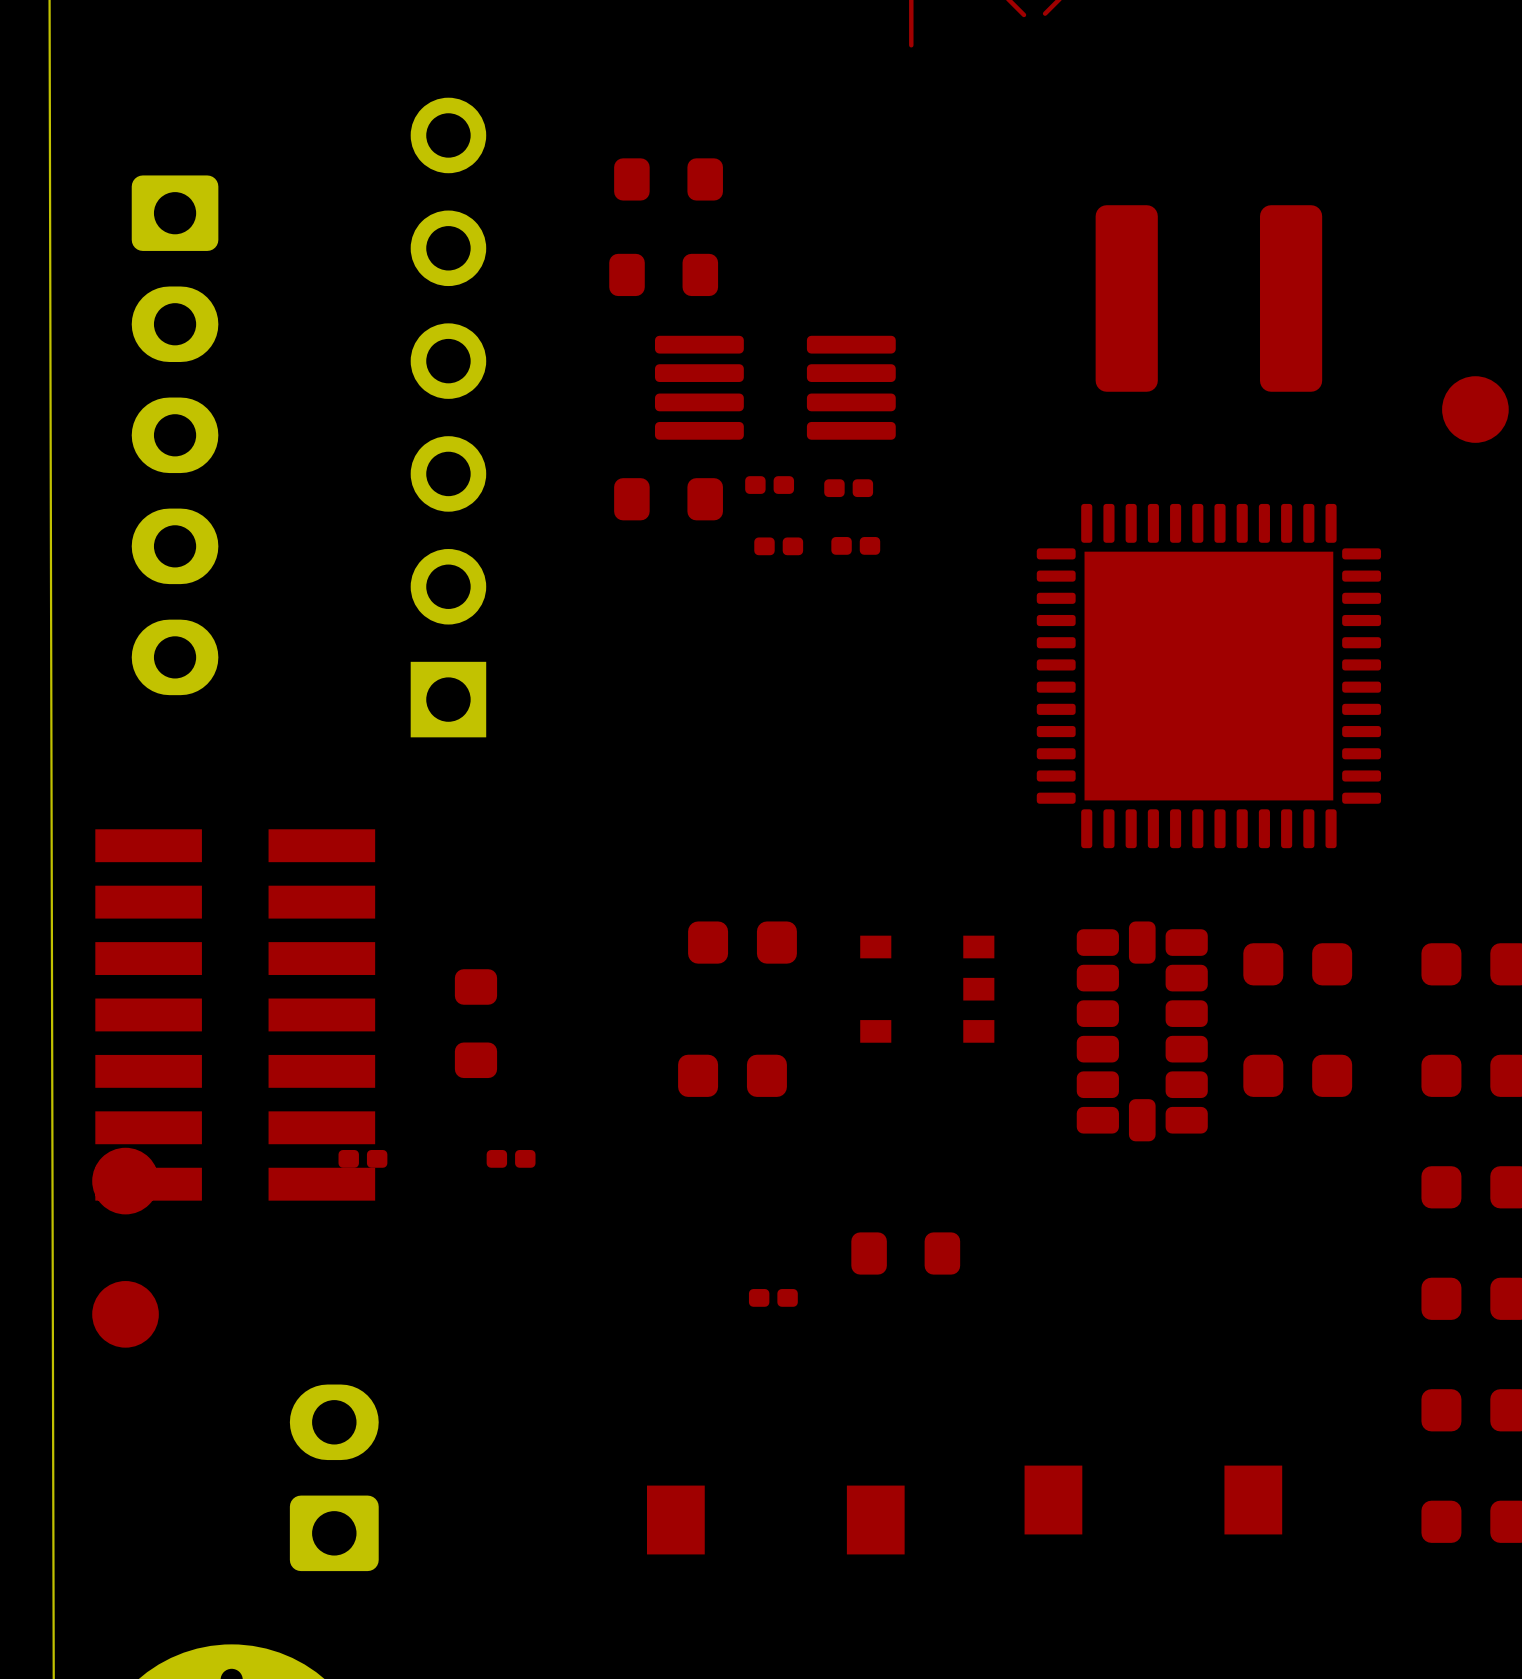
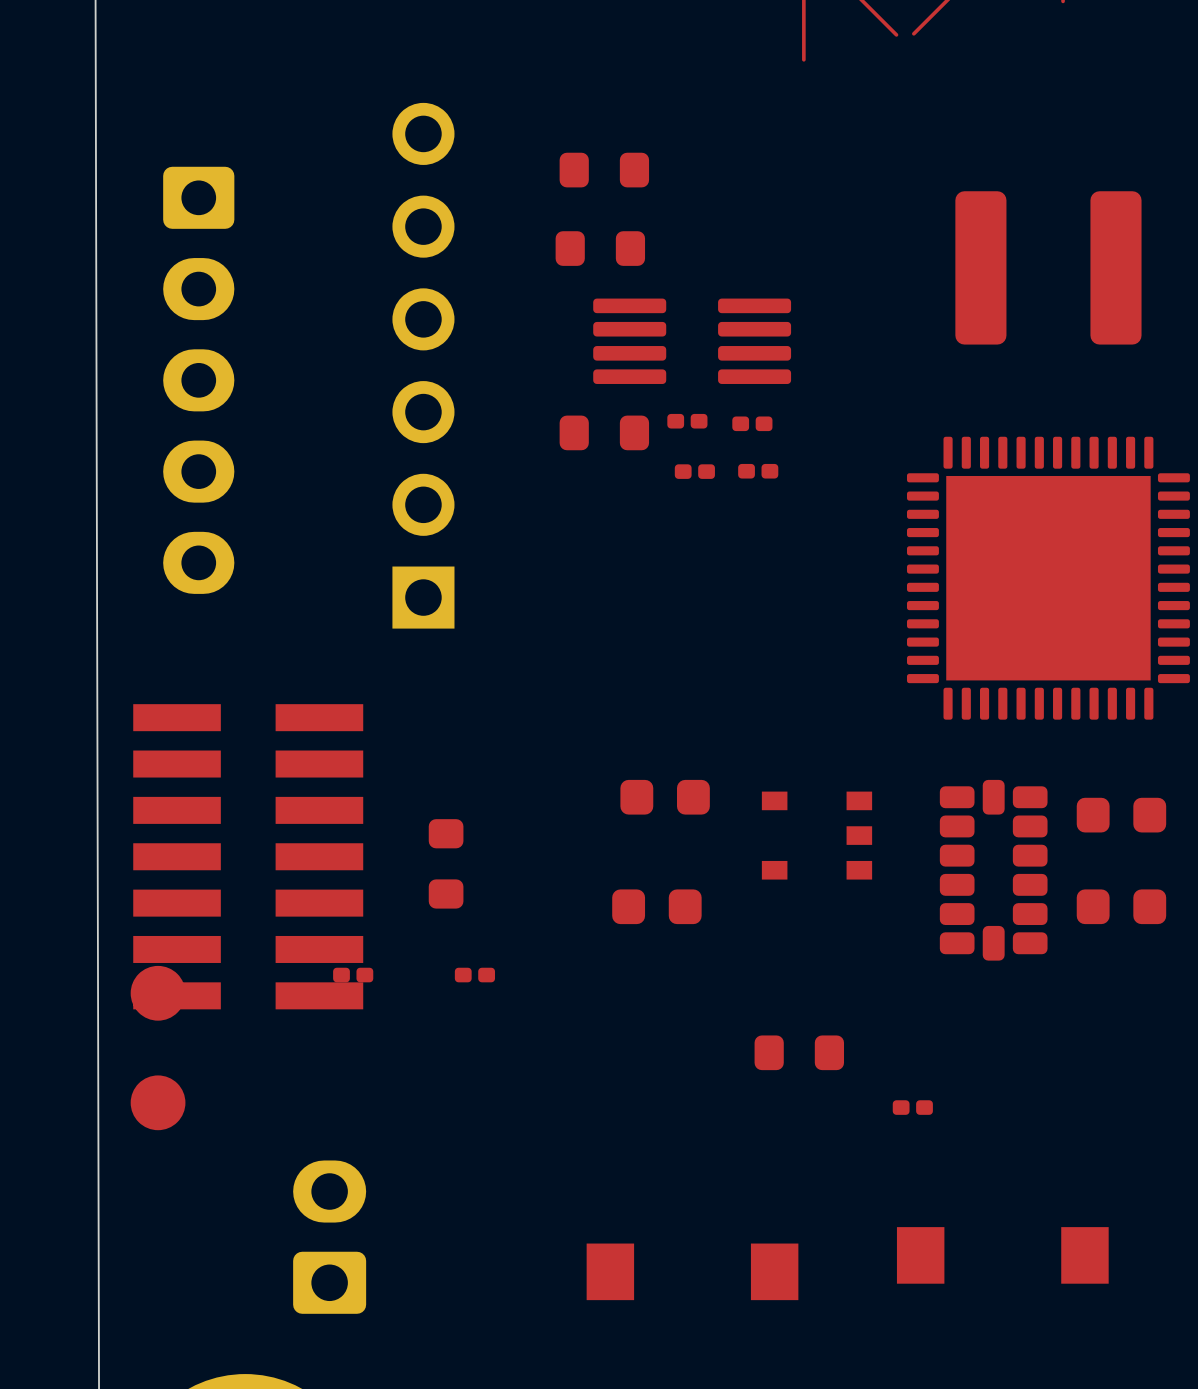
part position: (773, 1297) -> (912, 1107)

